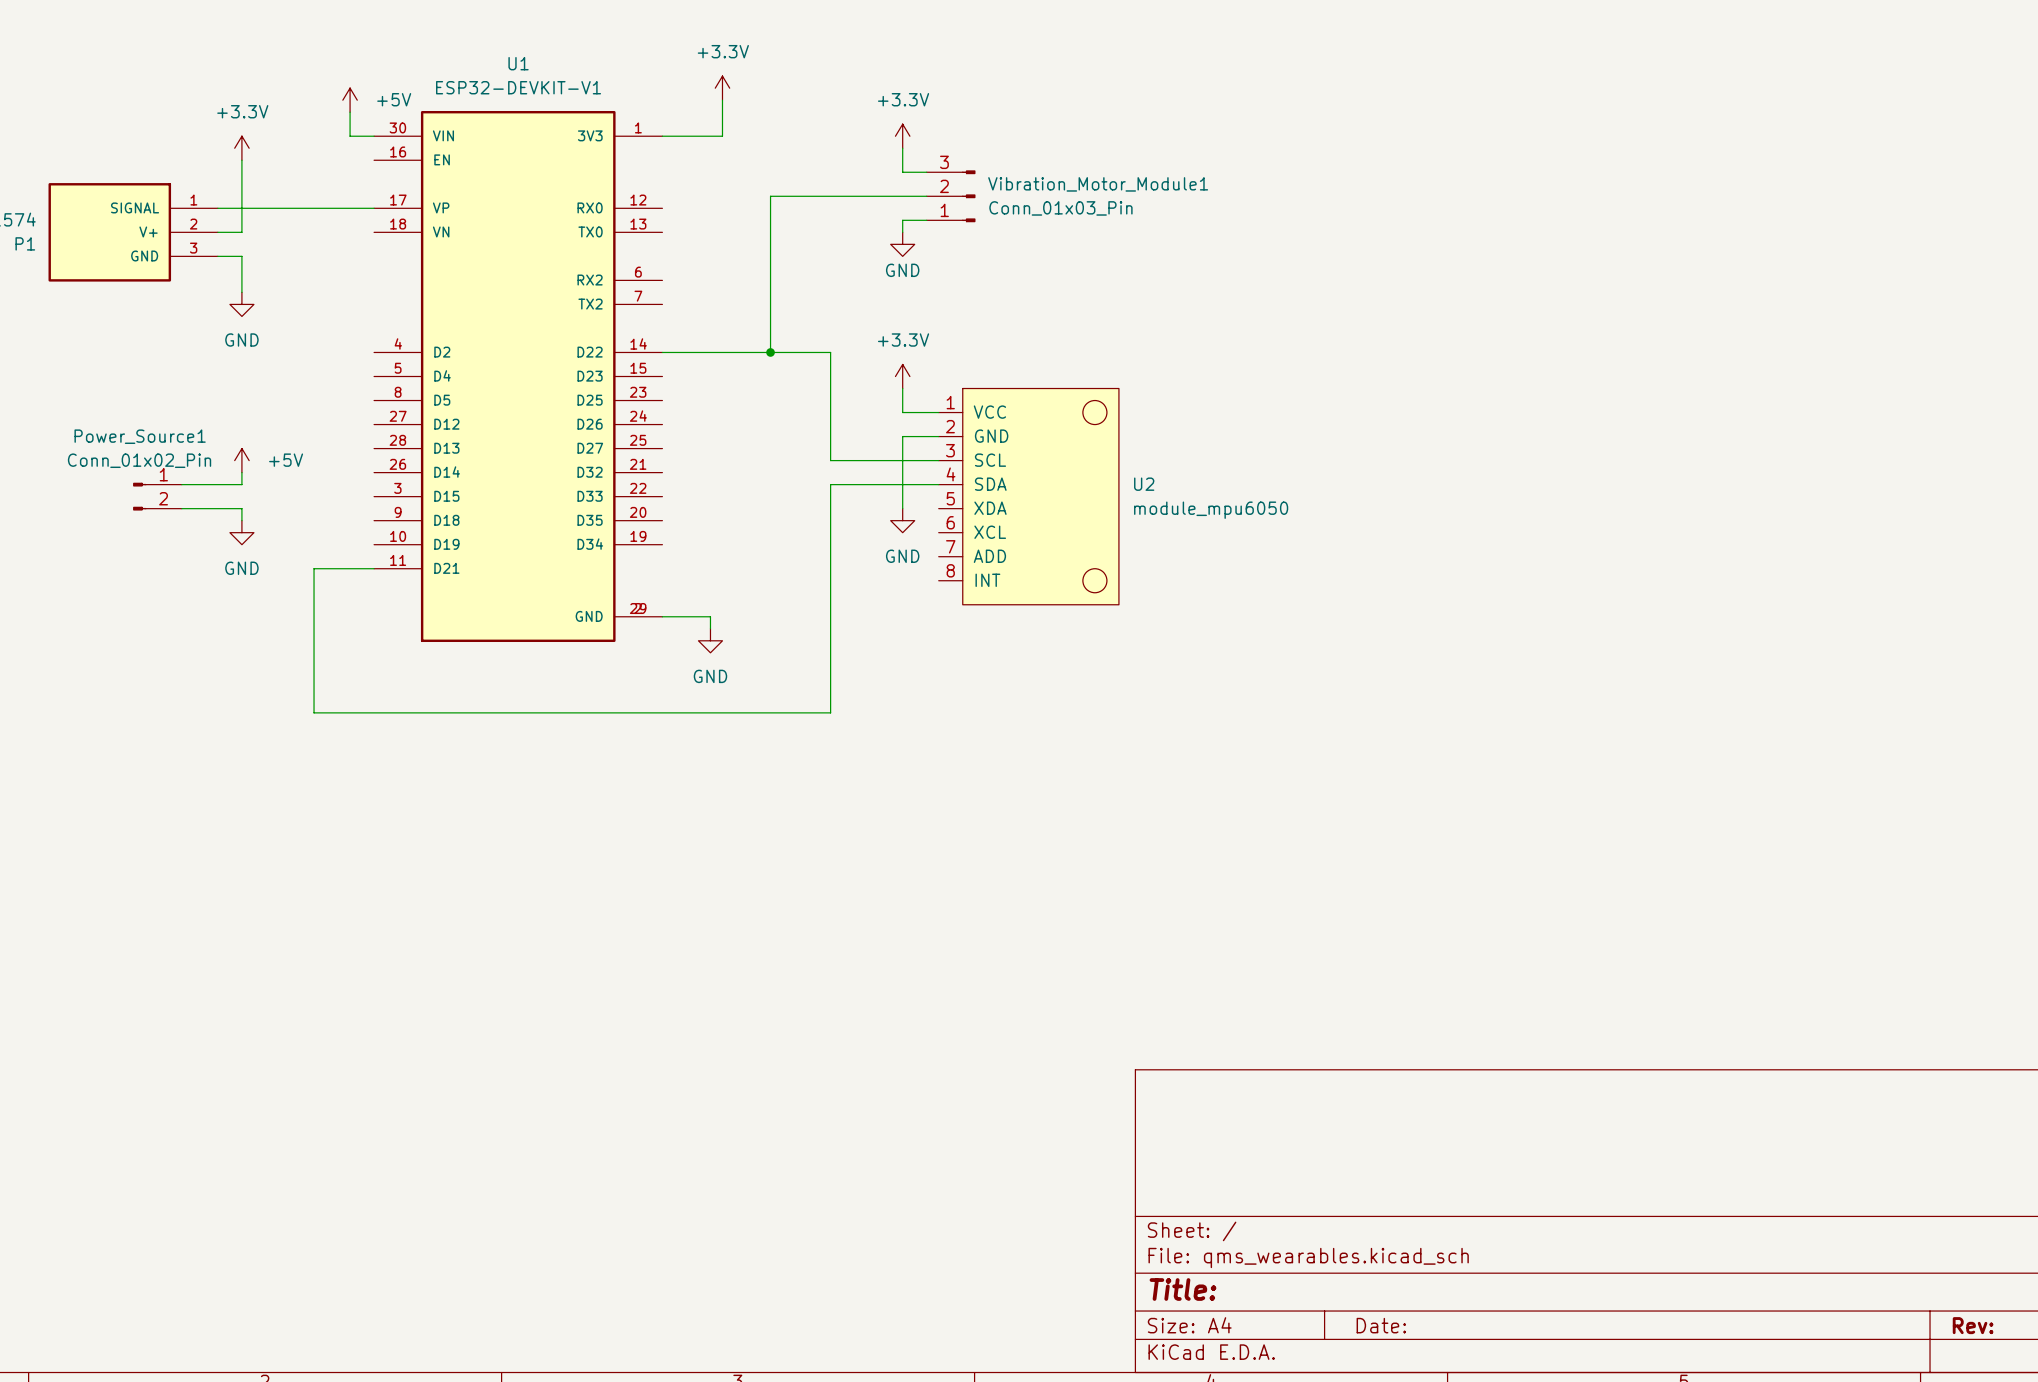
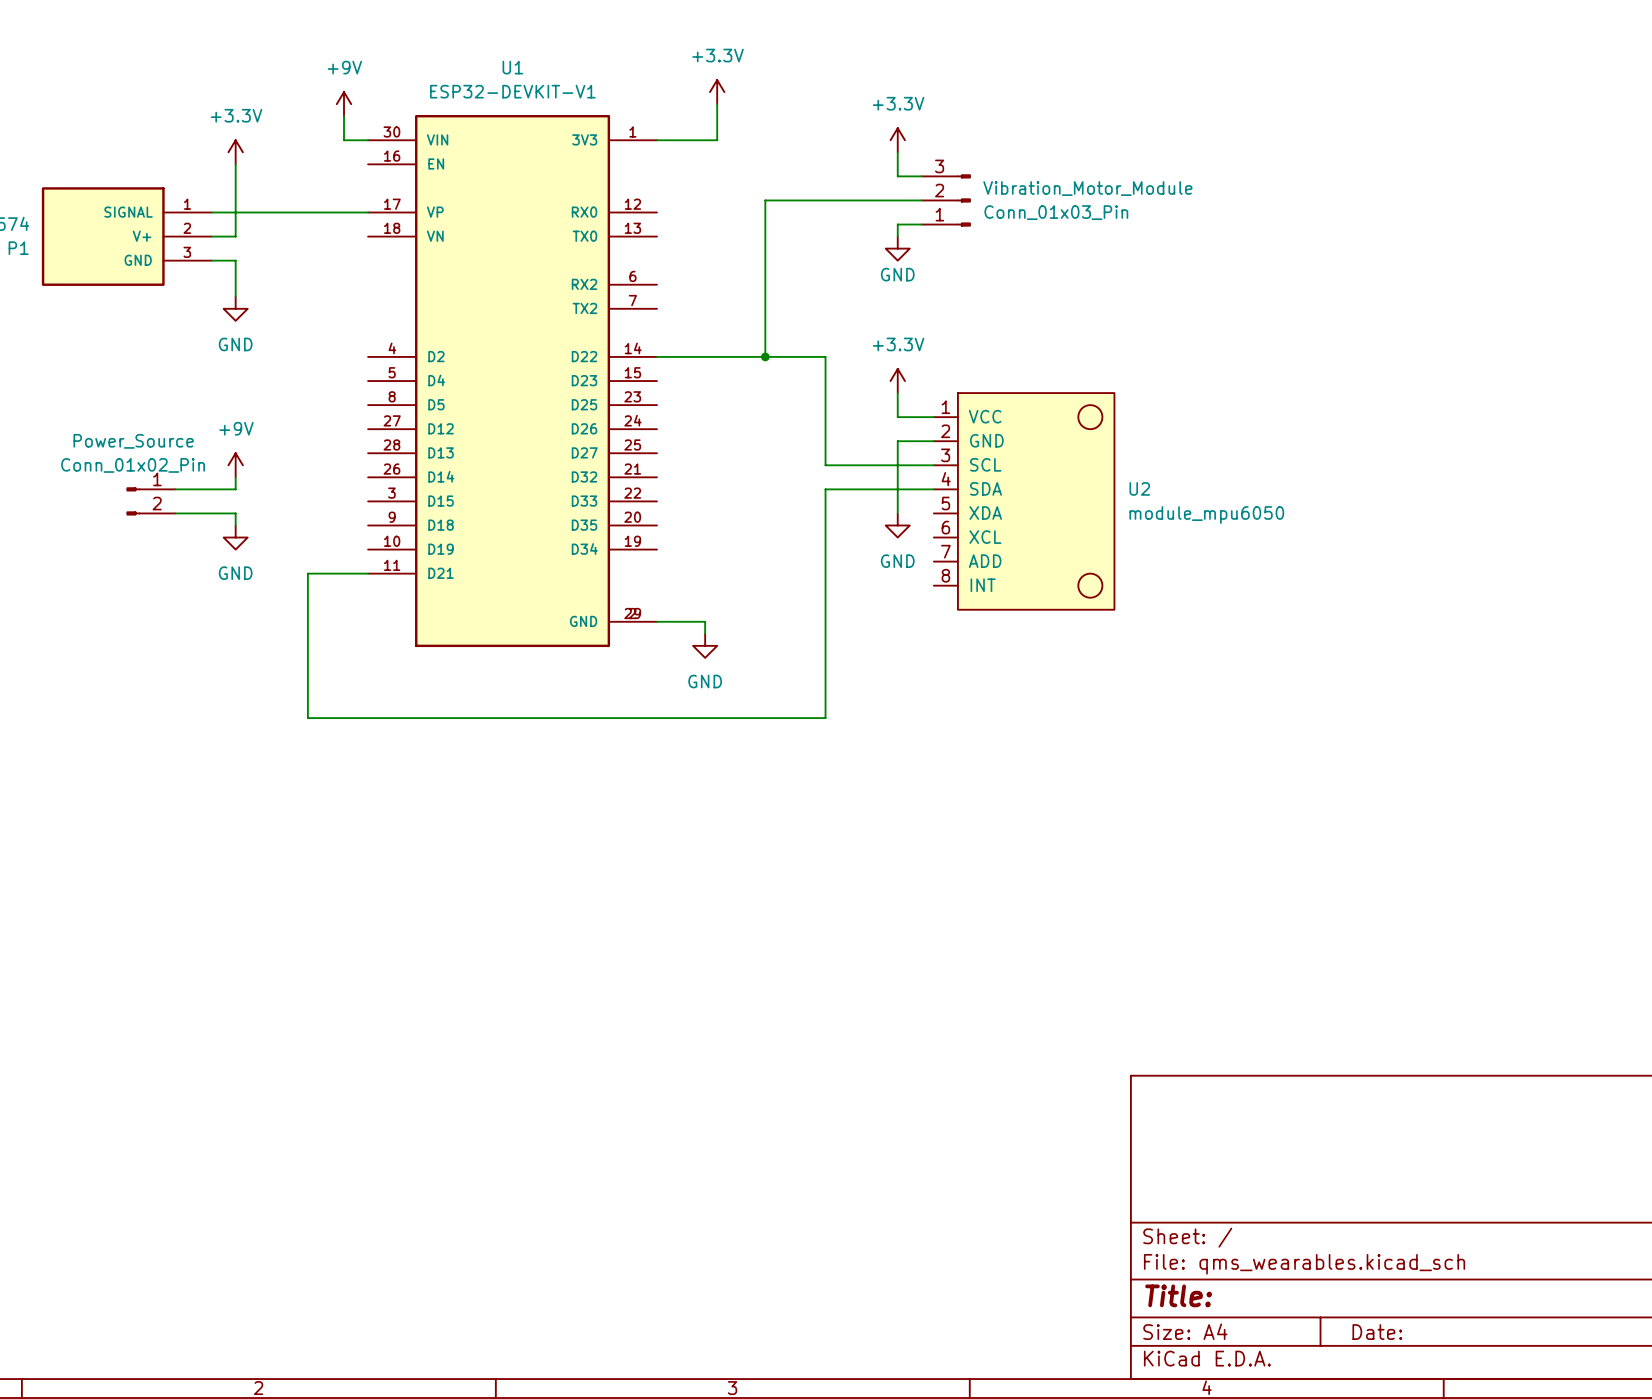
power symbol: +5V (350, 100) -> +9V (344, 104)
Vibration_Motor_Module1 name: Vibration_Motor_Module1 (1098, 184) -> Vibration_Motor_Module (1087, 188)
Power_Source1 name: Power_Source1 (140, 436) -> Power_Source (133, 441)
power symbol: +5V (241, 460) -> +9V (235, 465)

